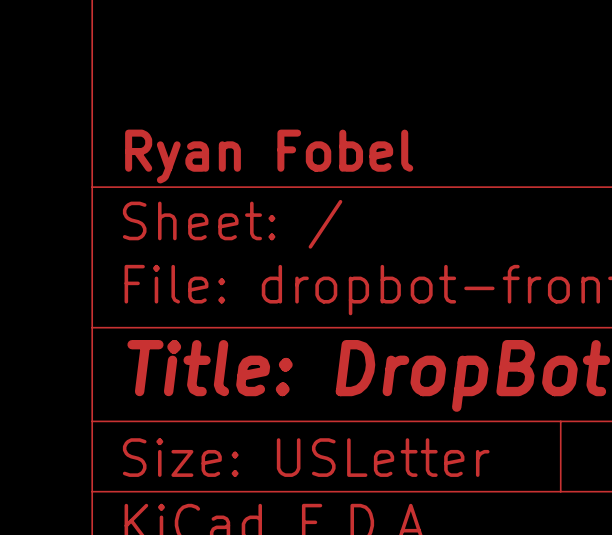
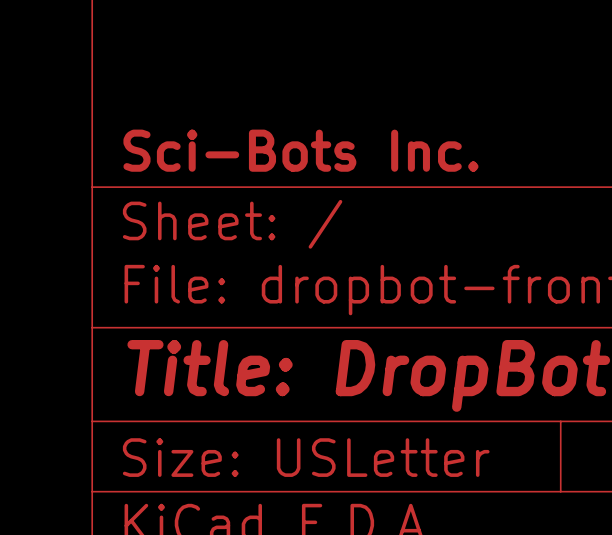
title block: Ryan Fobel (269, 156) -> Sci-Bots Inc. (300, 150)

